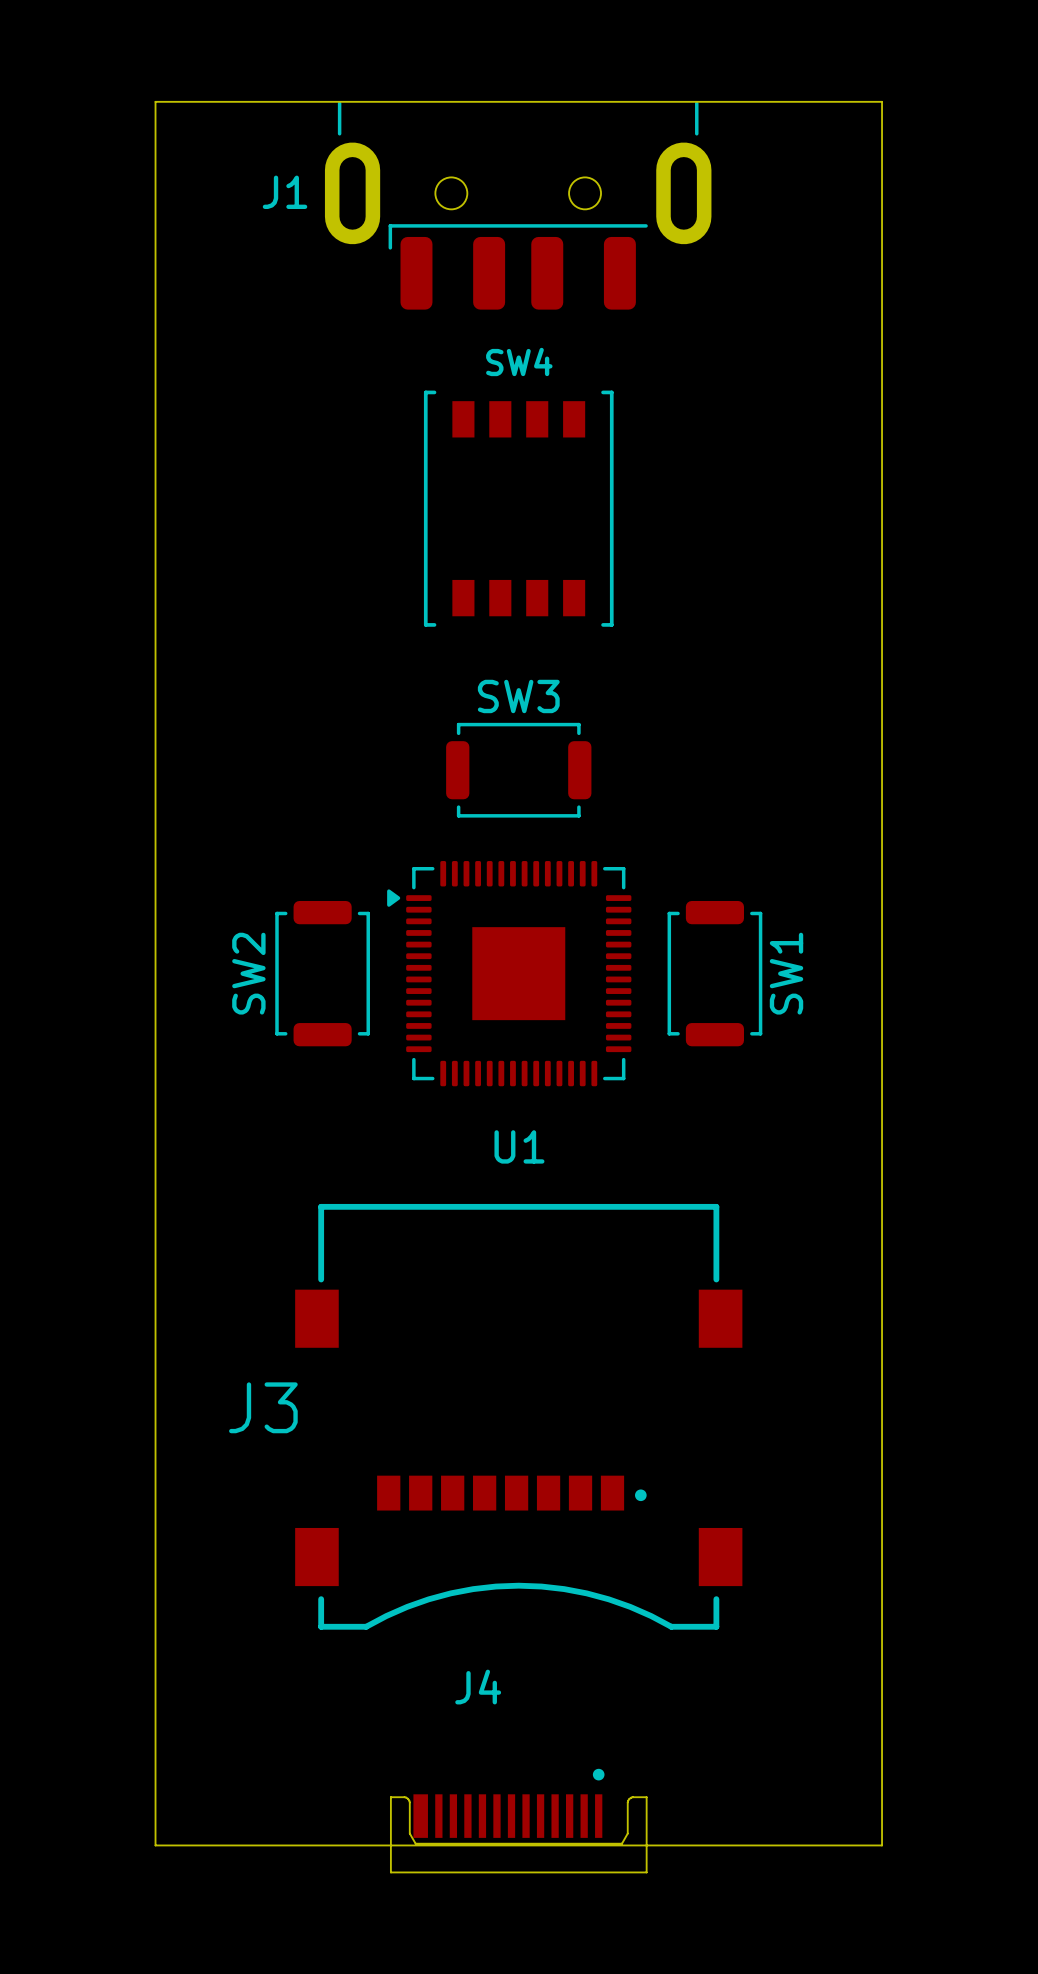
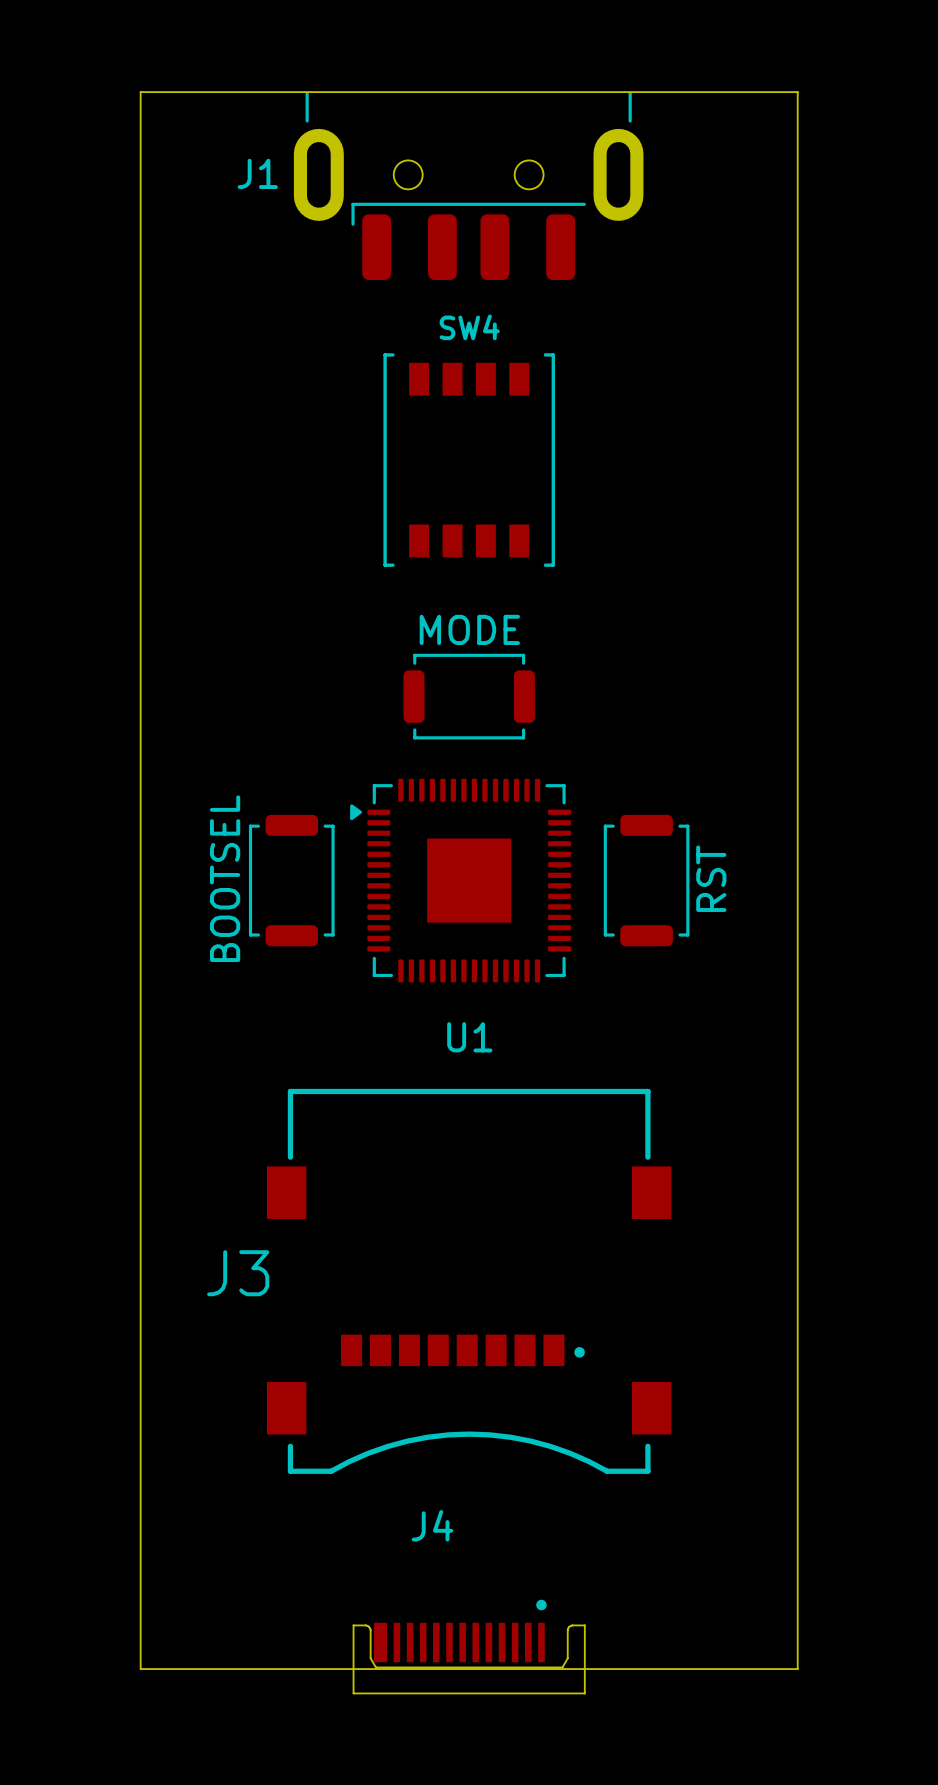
SW3 name: SW3 (518, 696) -> MODE (469, 629)
SW2 name: SW2 (248, 973) -> BOOTSEL (225, 878)
SW1 name: SW1 (786, 973) -> RST (711, 878)

